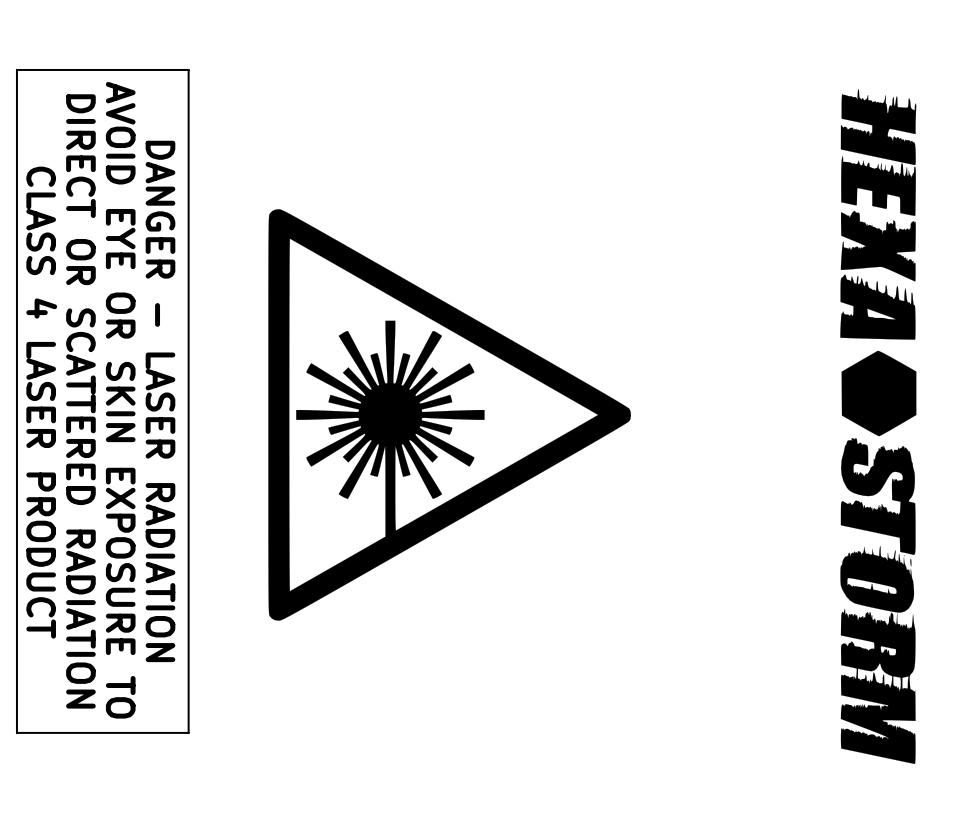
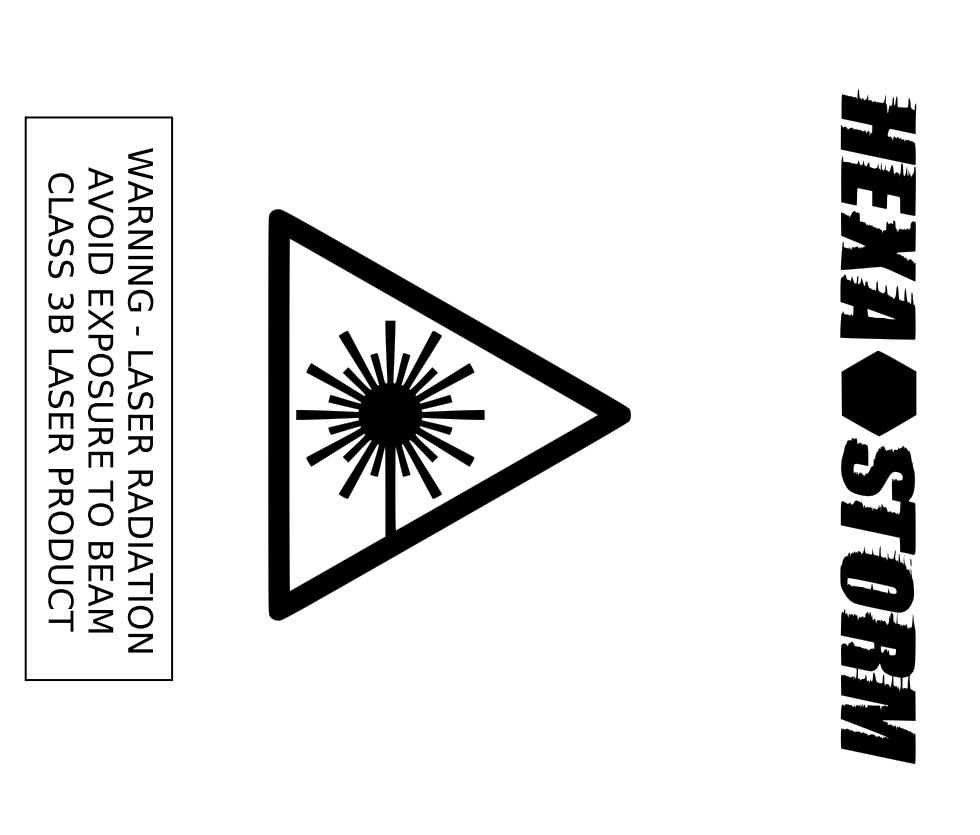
line: (16, 69) (188, 69) (188, 732) (16, 732) (16, 69) -> none
line: none -> (25, 117) (25, 680)
line: none -> (25, 117) (172, 117)
line: none -> (172, 117) (172, 679)
text: AVOID EYE OR SKIN EXPOSURE TO (120, 400) -> AVOID EXPOSURE TO BEAM (100, 399)
text: DIRECT OR SCATTERED RADIATION (80, 401) -> none
text: DANGER - LASER RADIATION (160, 401) -> WARNING - LASER RADIATION (140, 400)
text: CLASS 4 LASER PRODUCT (41, 402) -> CLASS 3B LASER PRODUCT (61, 402)
line: none -> (25, 680) (172, 680)

